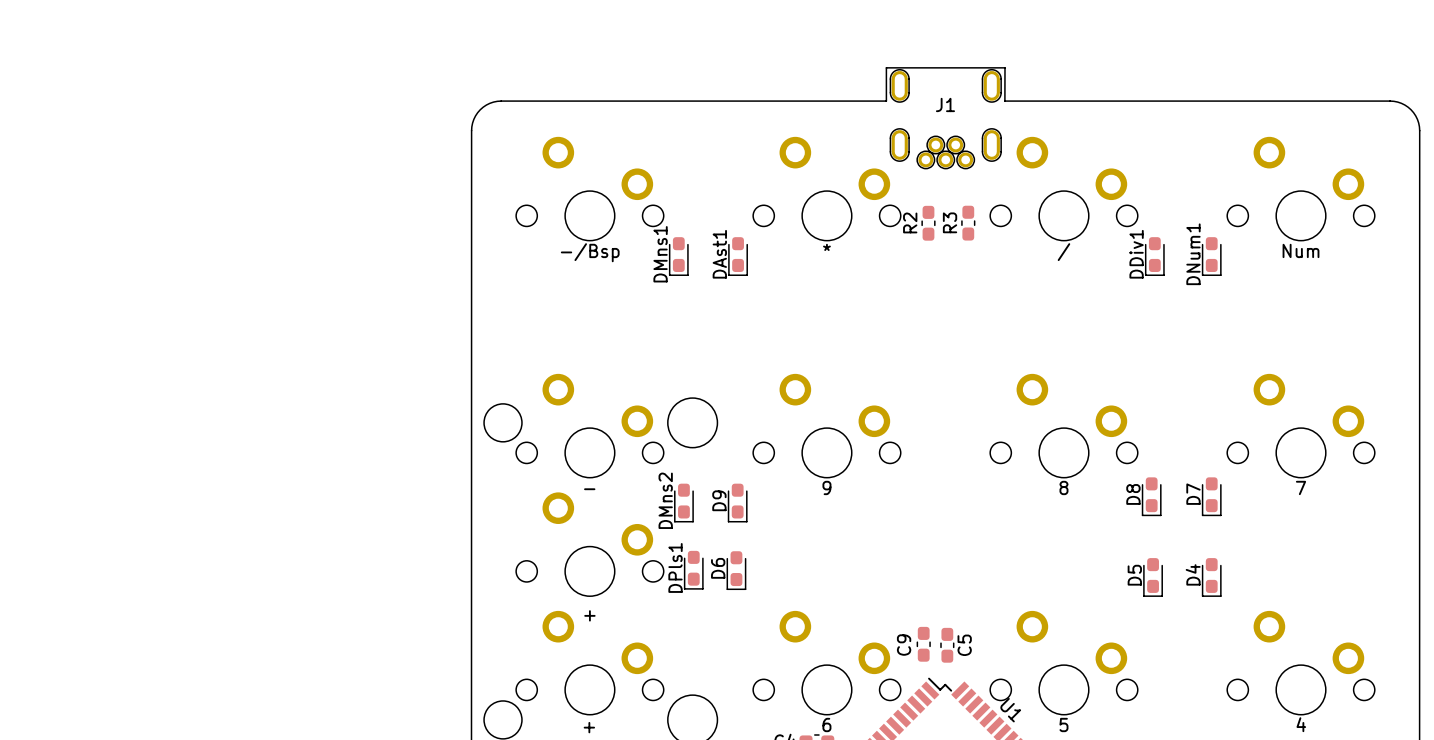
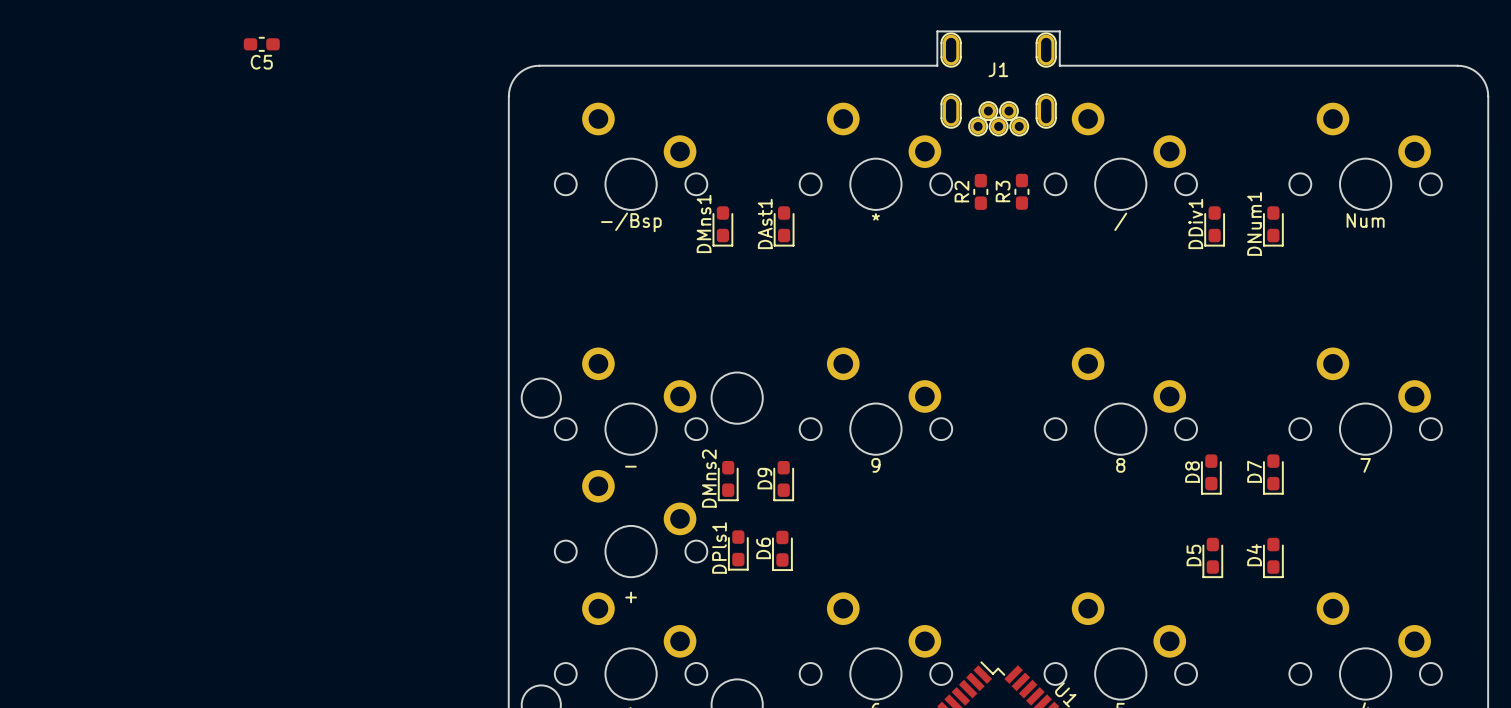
C9: (923, 644) -> none
C5 rotation: 0° (947, 645) -> 90° clockwise (261, 44)
C5 position: (947, 645) -> (261, 44)

